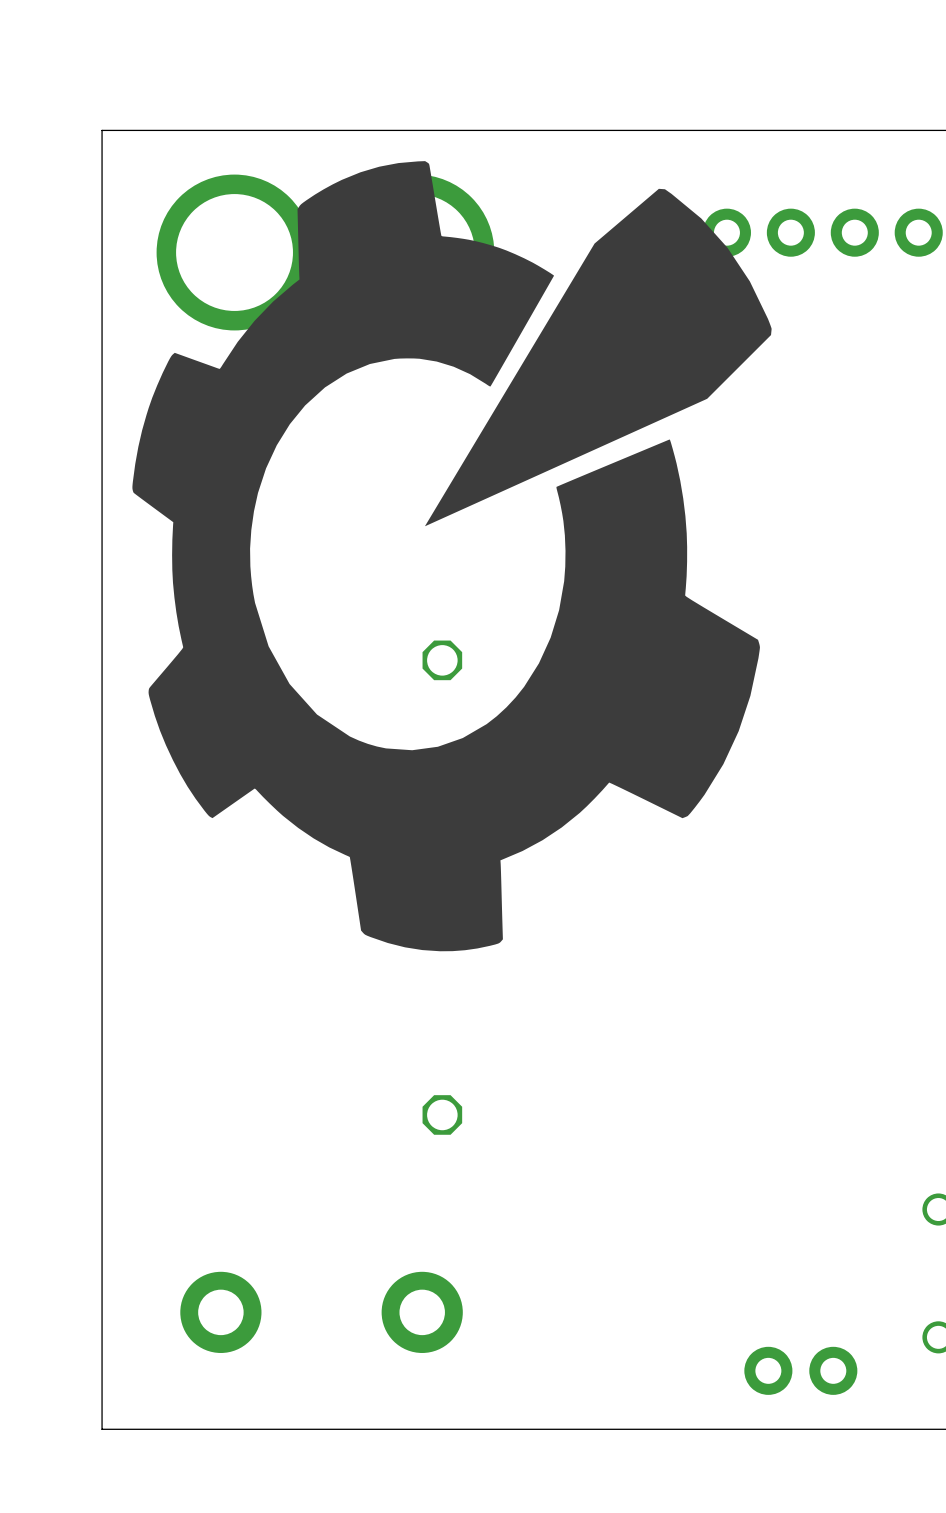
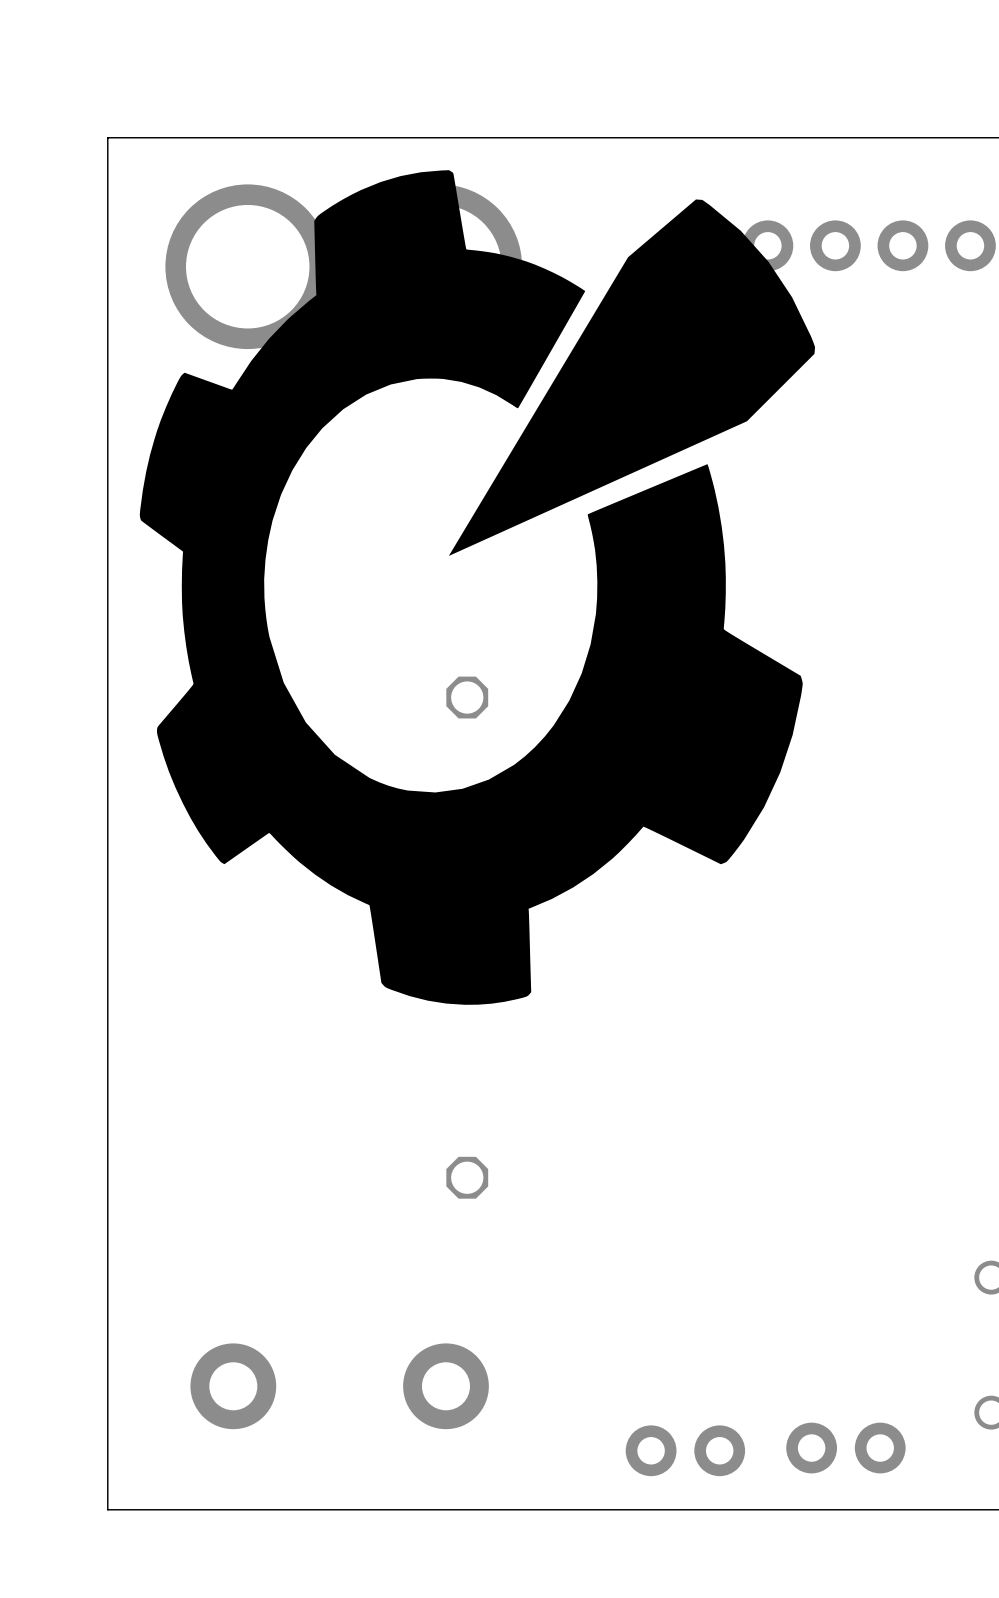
part: none -> (685, 1450)

